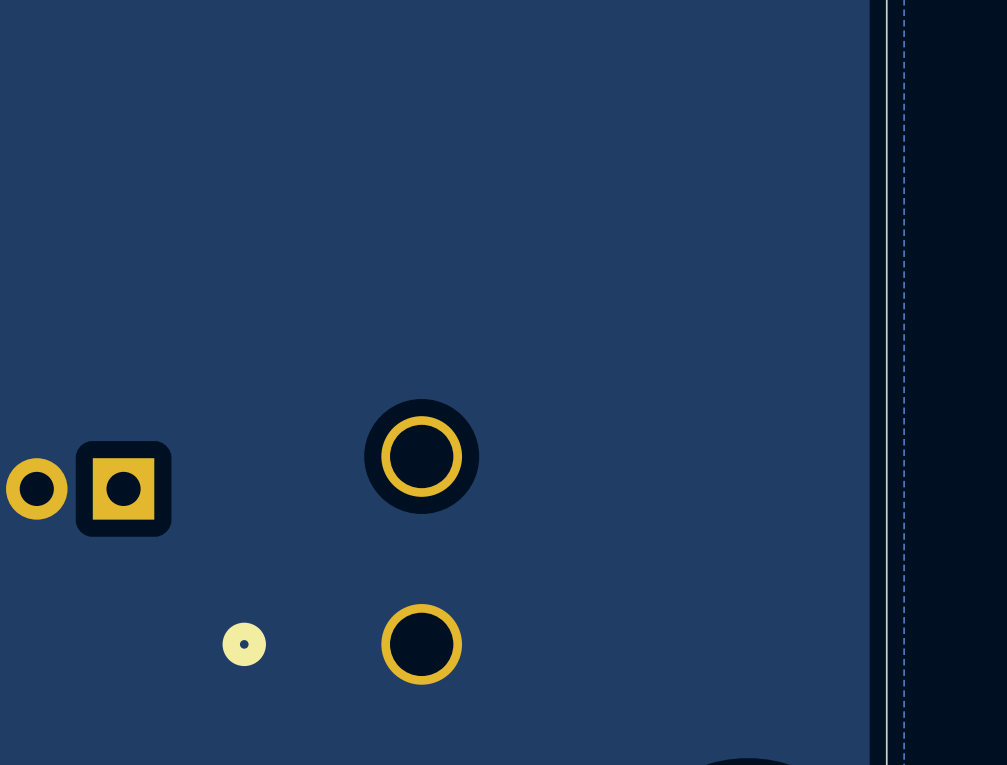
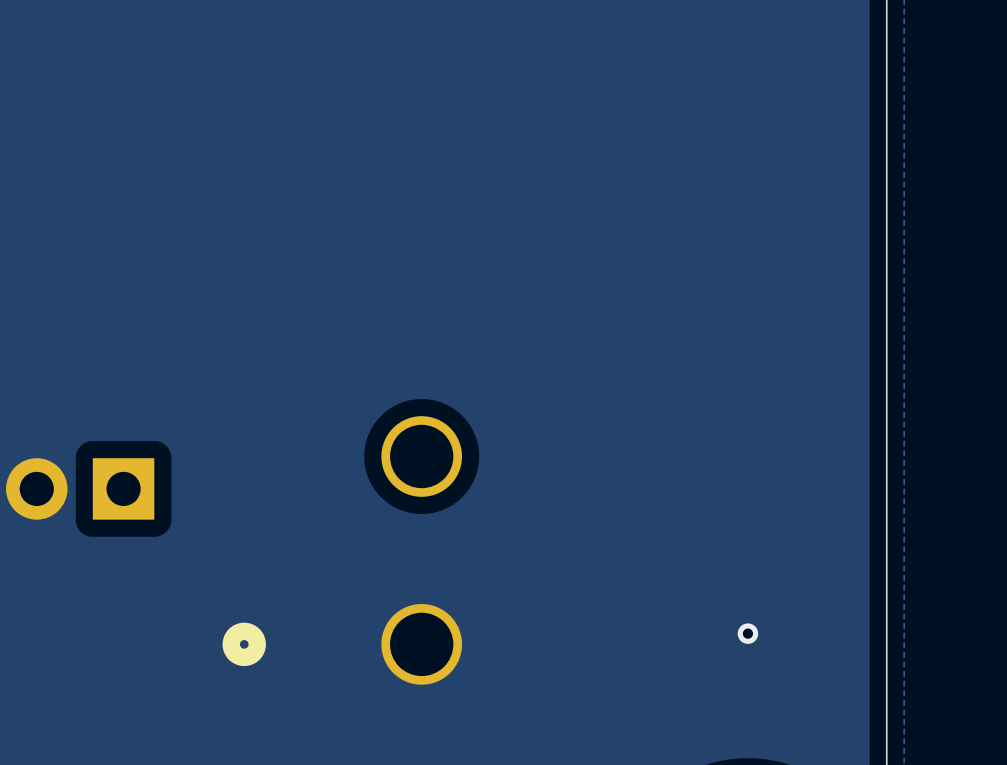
via: none -> (747, 633)

